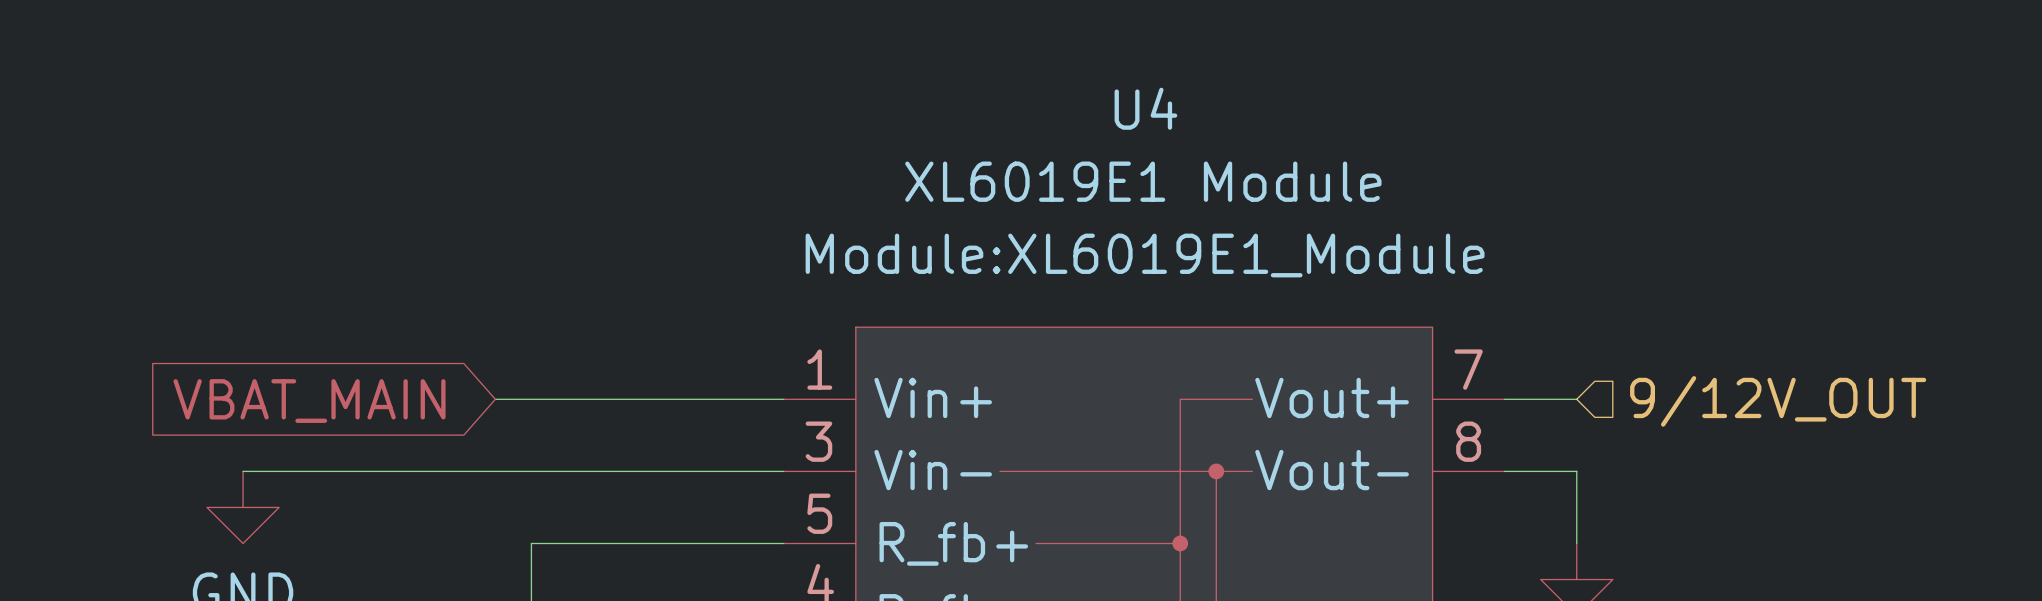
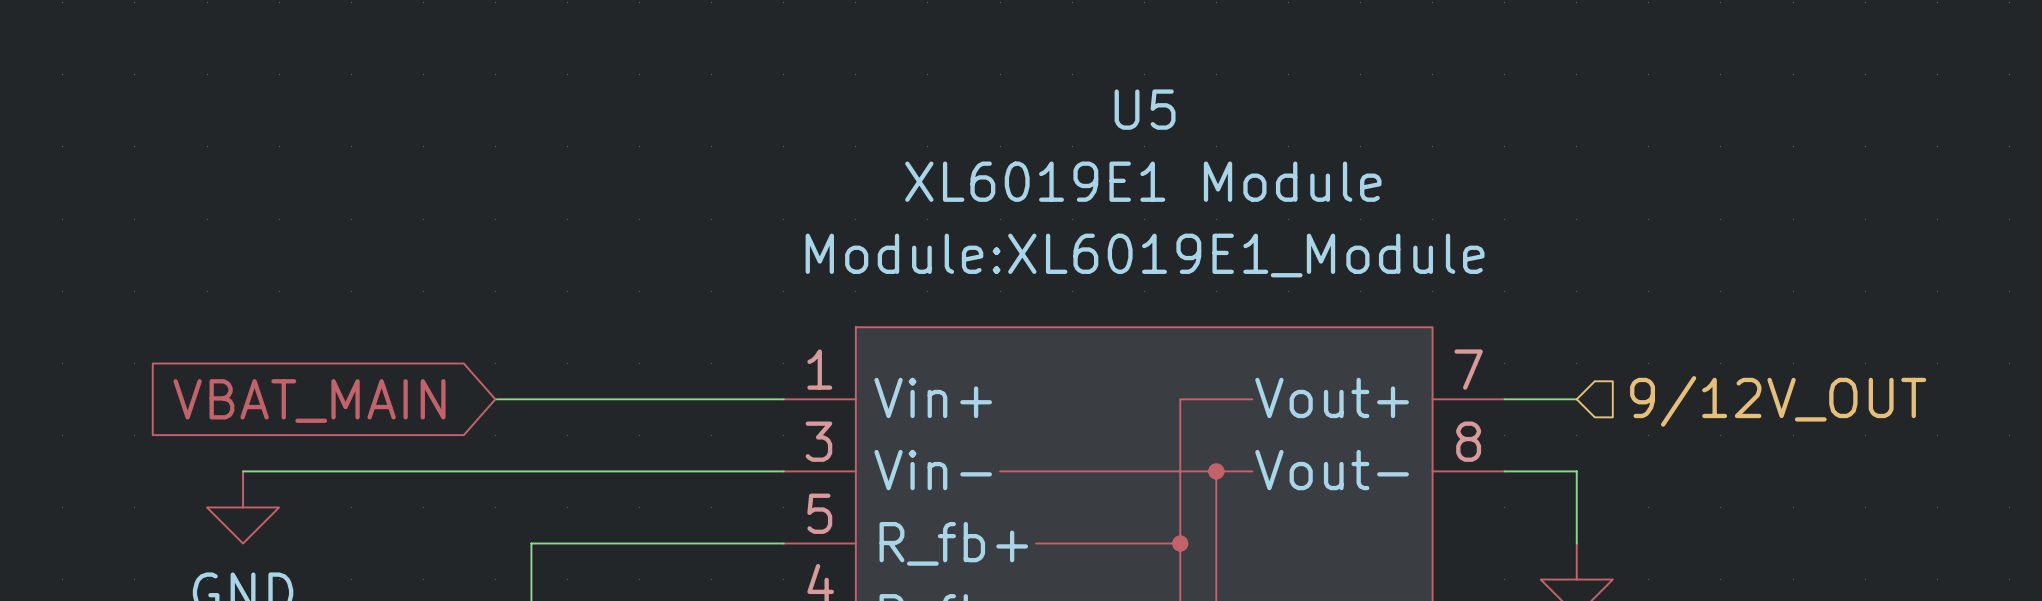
U4 name: U4 (1145, 108) -> U5 (1145, 109)

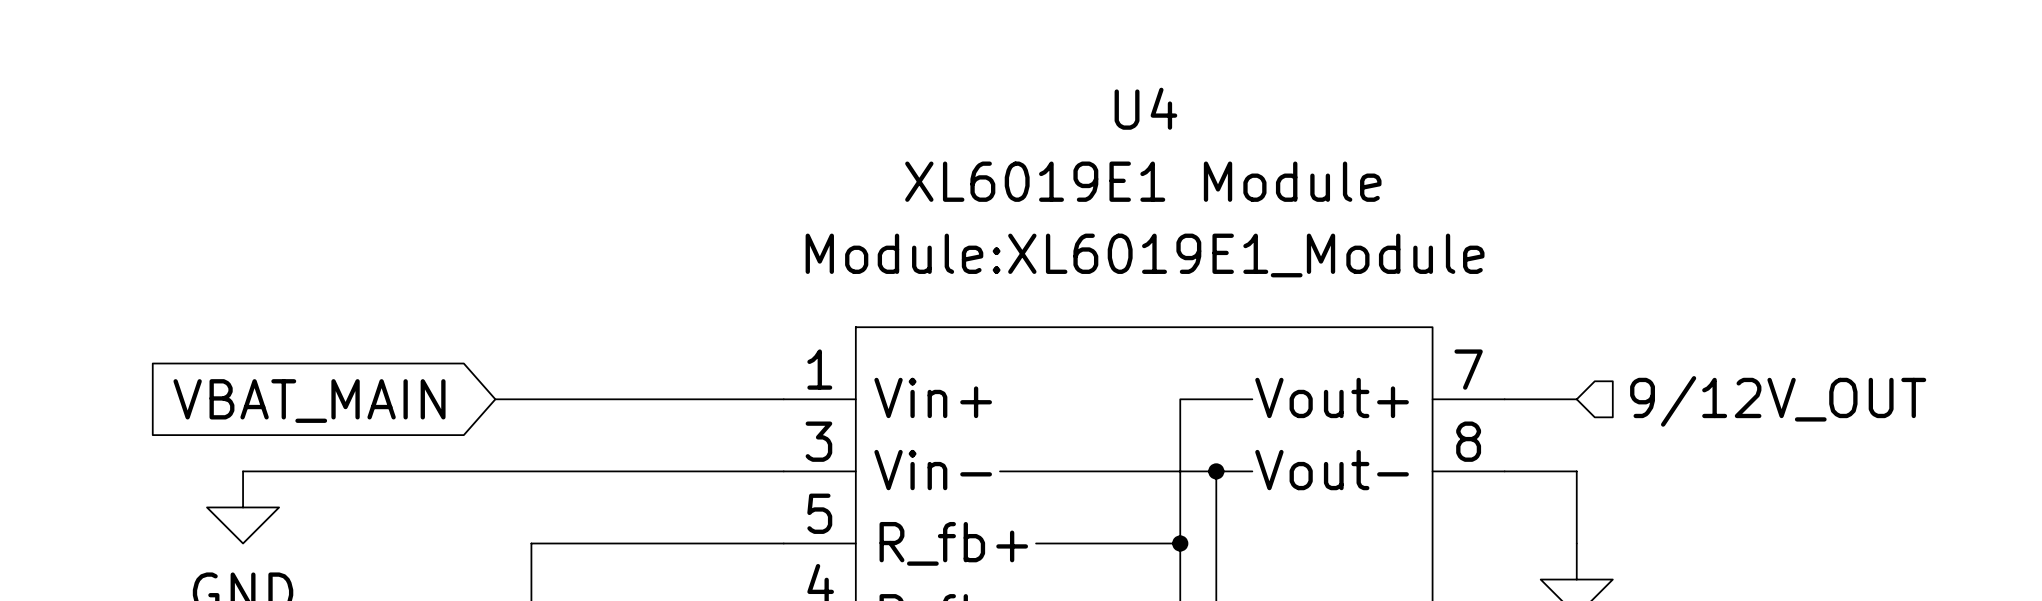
U5 name: U5 (1145, 109) -> U4 (1145, 108)

